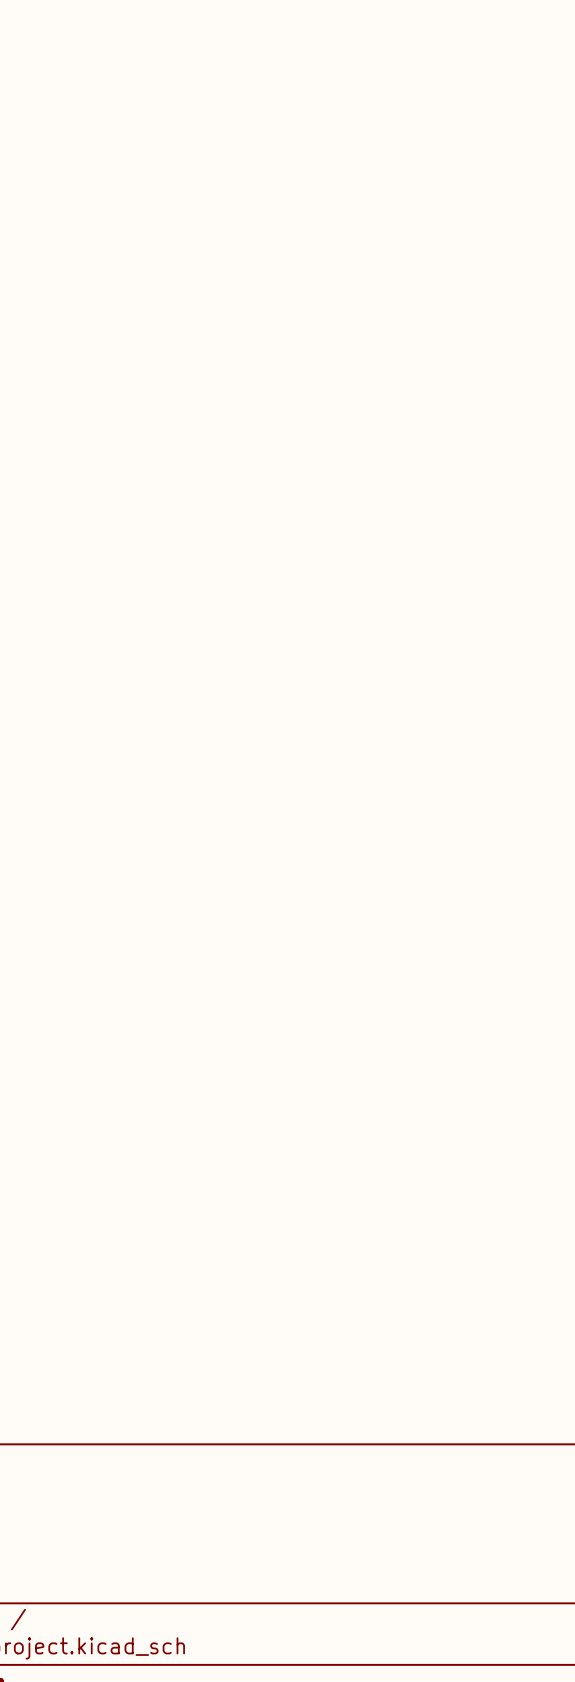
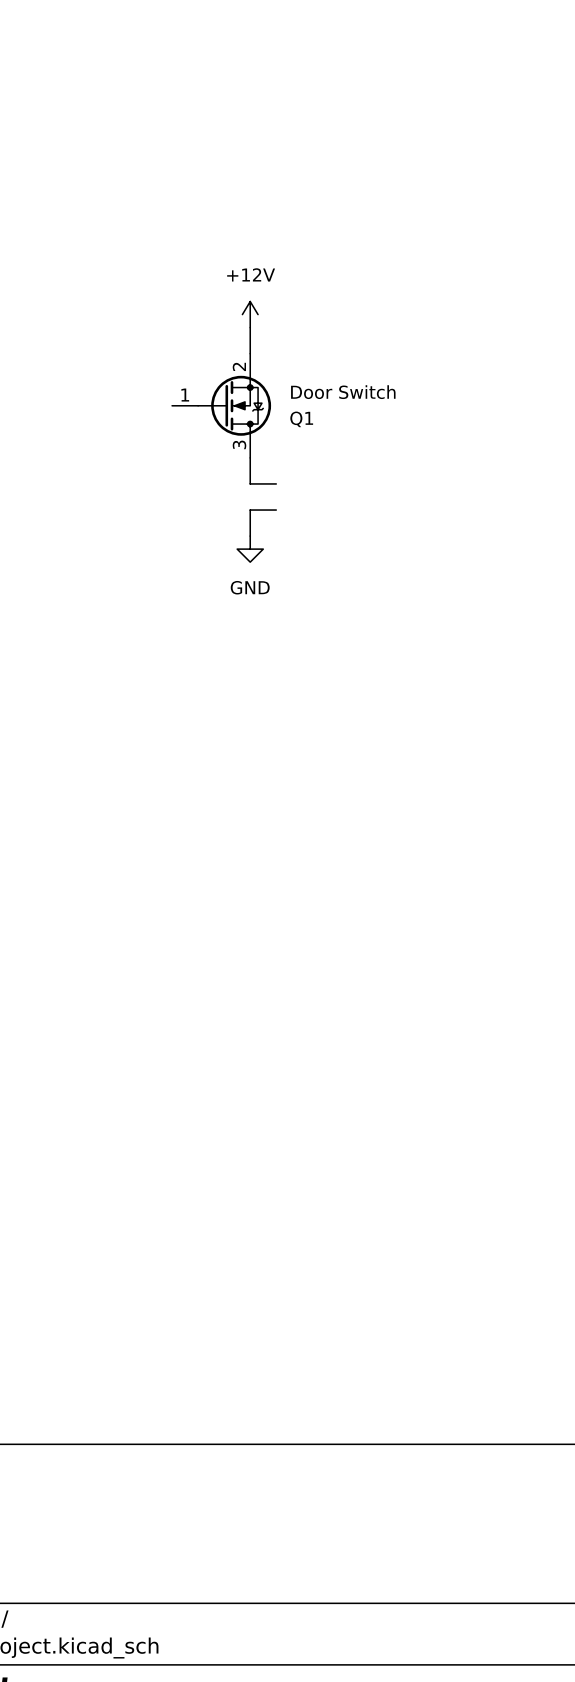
power symbol: none -> +12V (250, 314)
wire: none -> (250, 327) (250, 353)
Q1: none -> Door Switch (221, 405)
wire: none -> (250, 457) (250, 483) (276, 483)
wire: none -> (276, 510) (250, 510) (250, 536)
power symbol: none -> GND (250, 549)

